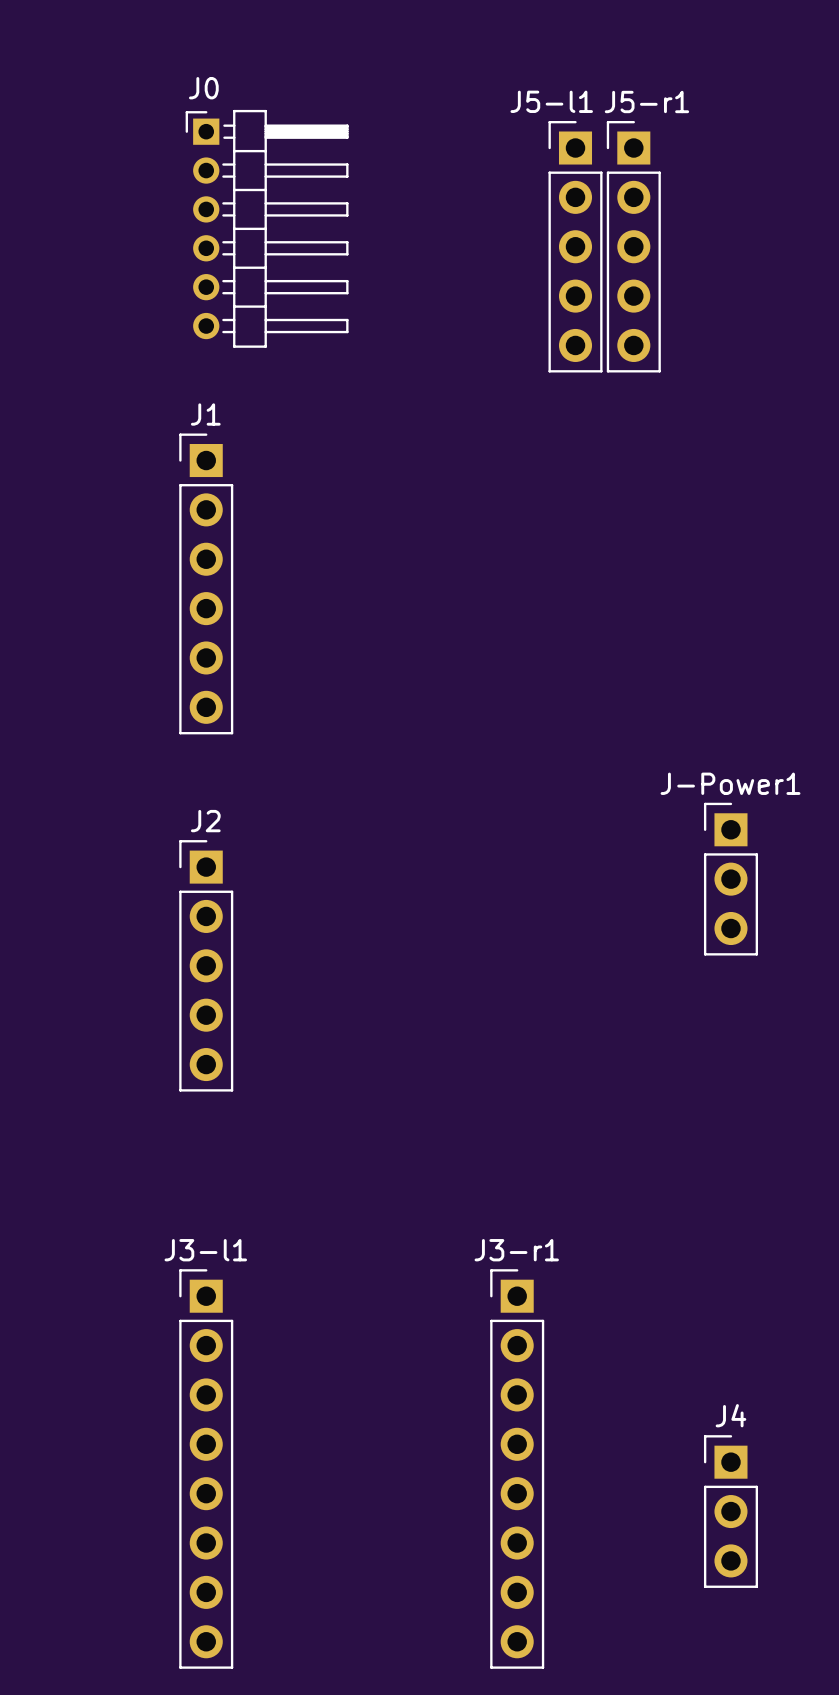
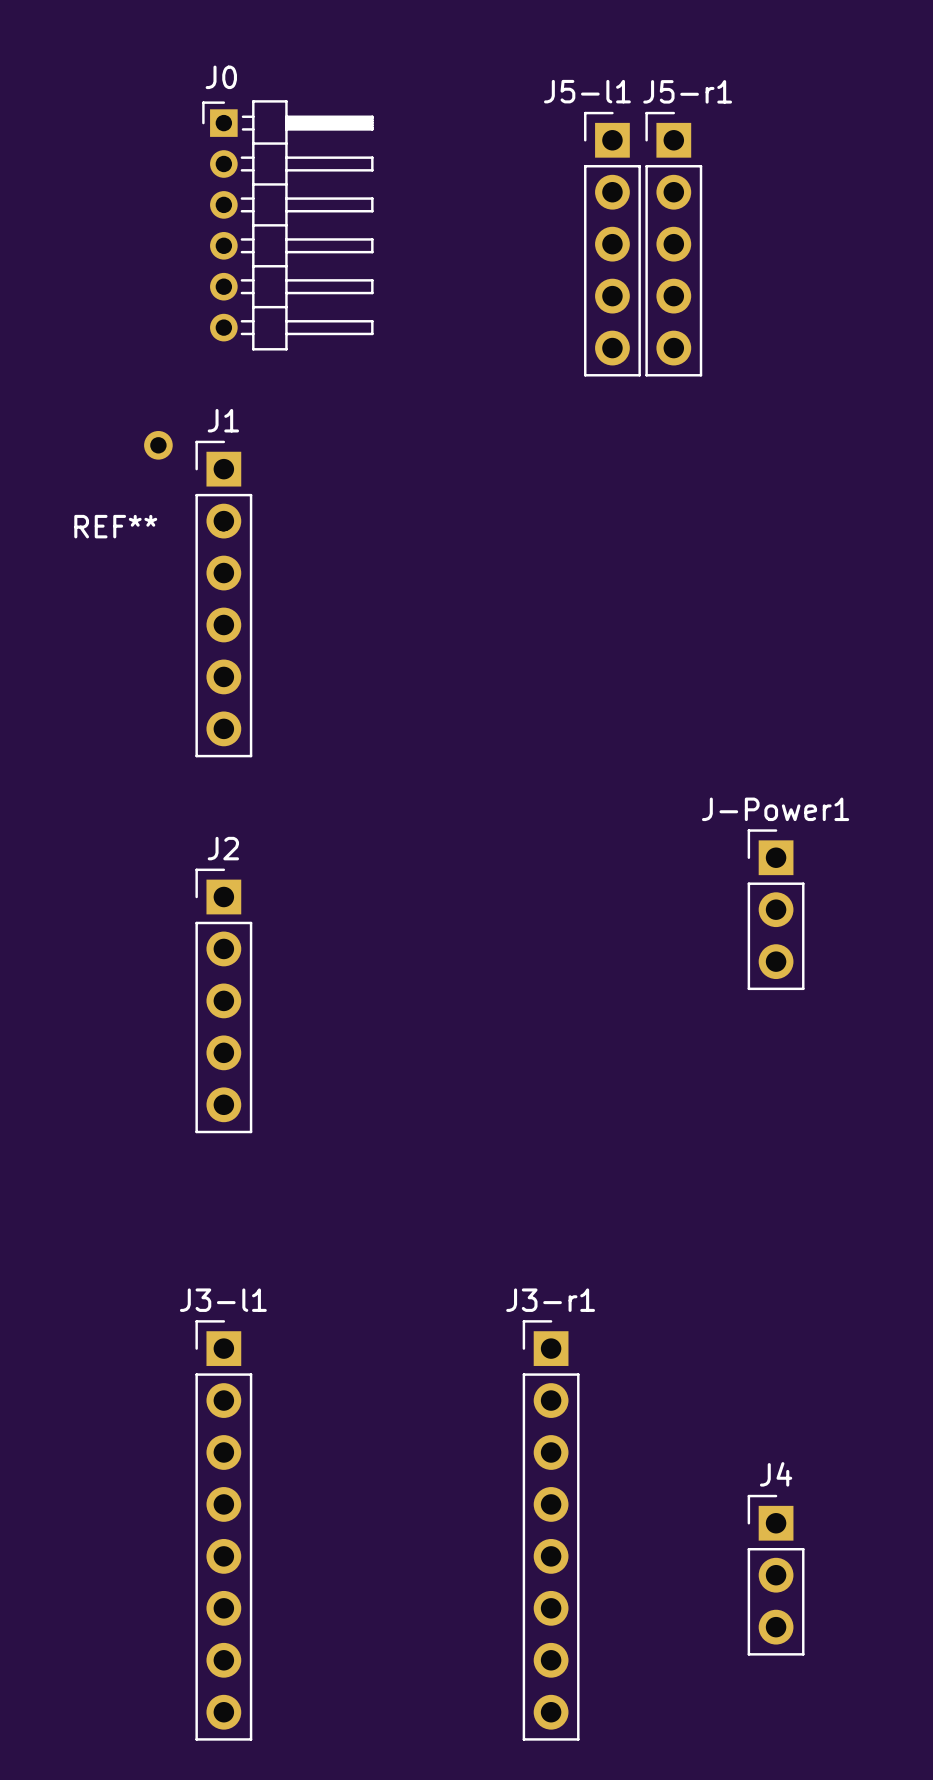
REF**: none -> (190, 484)

